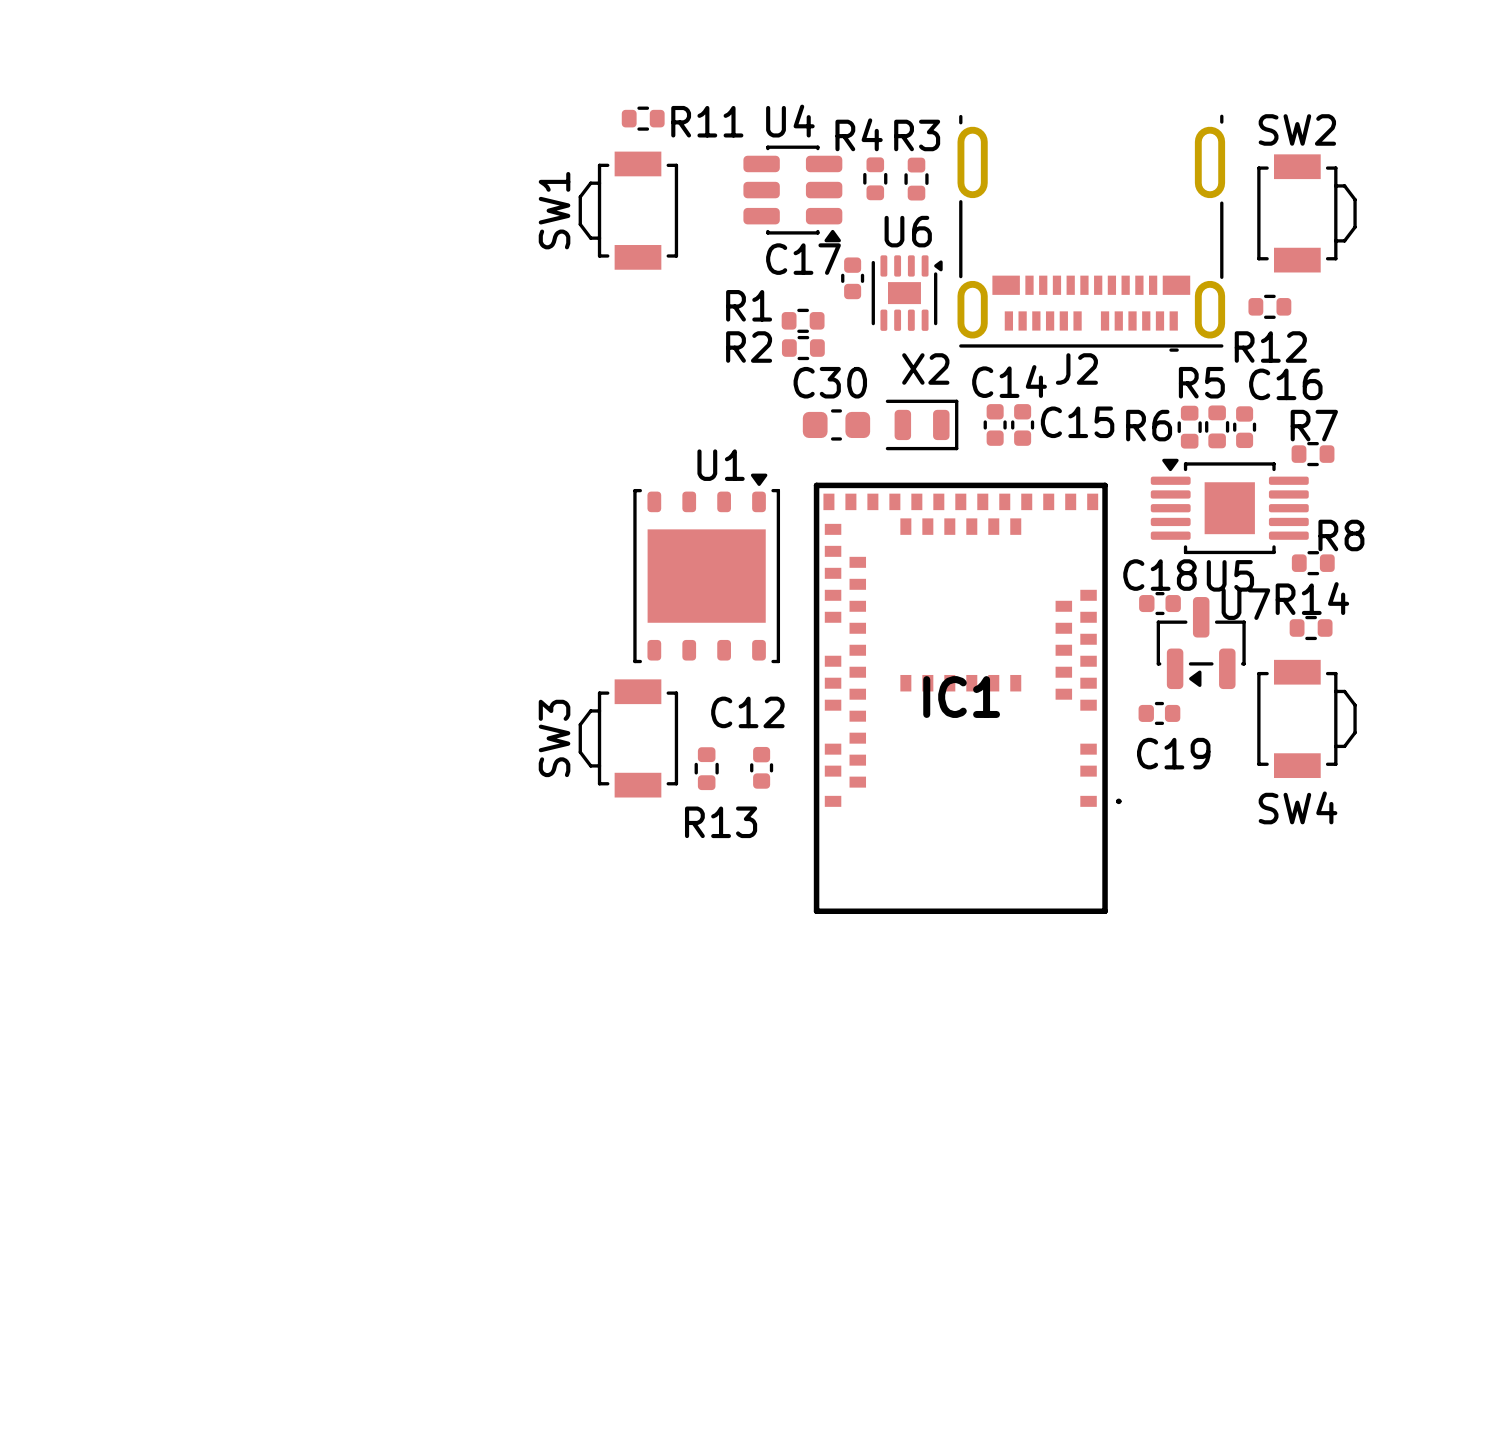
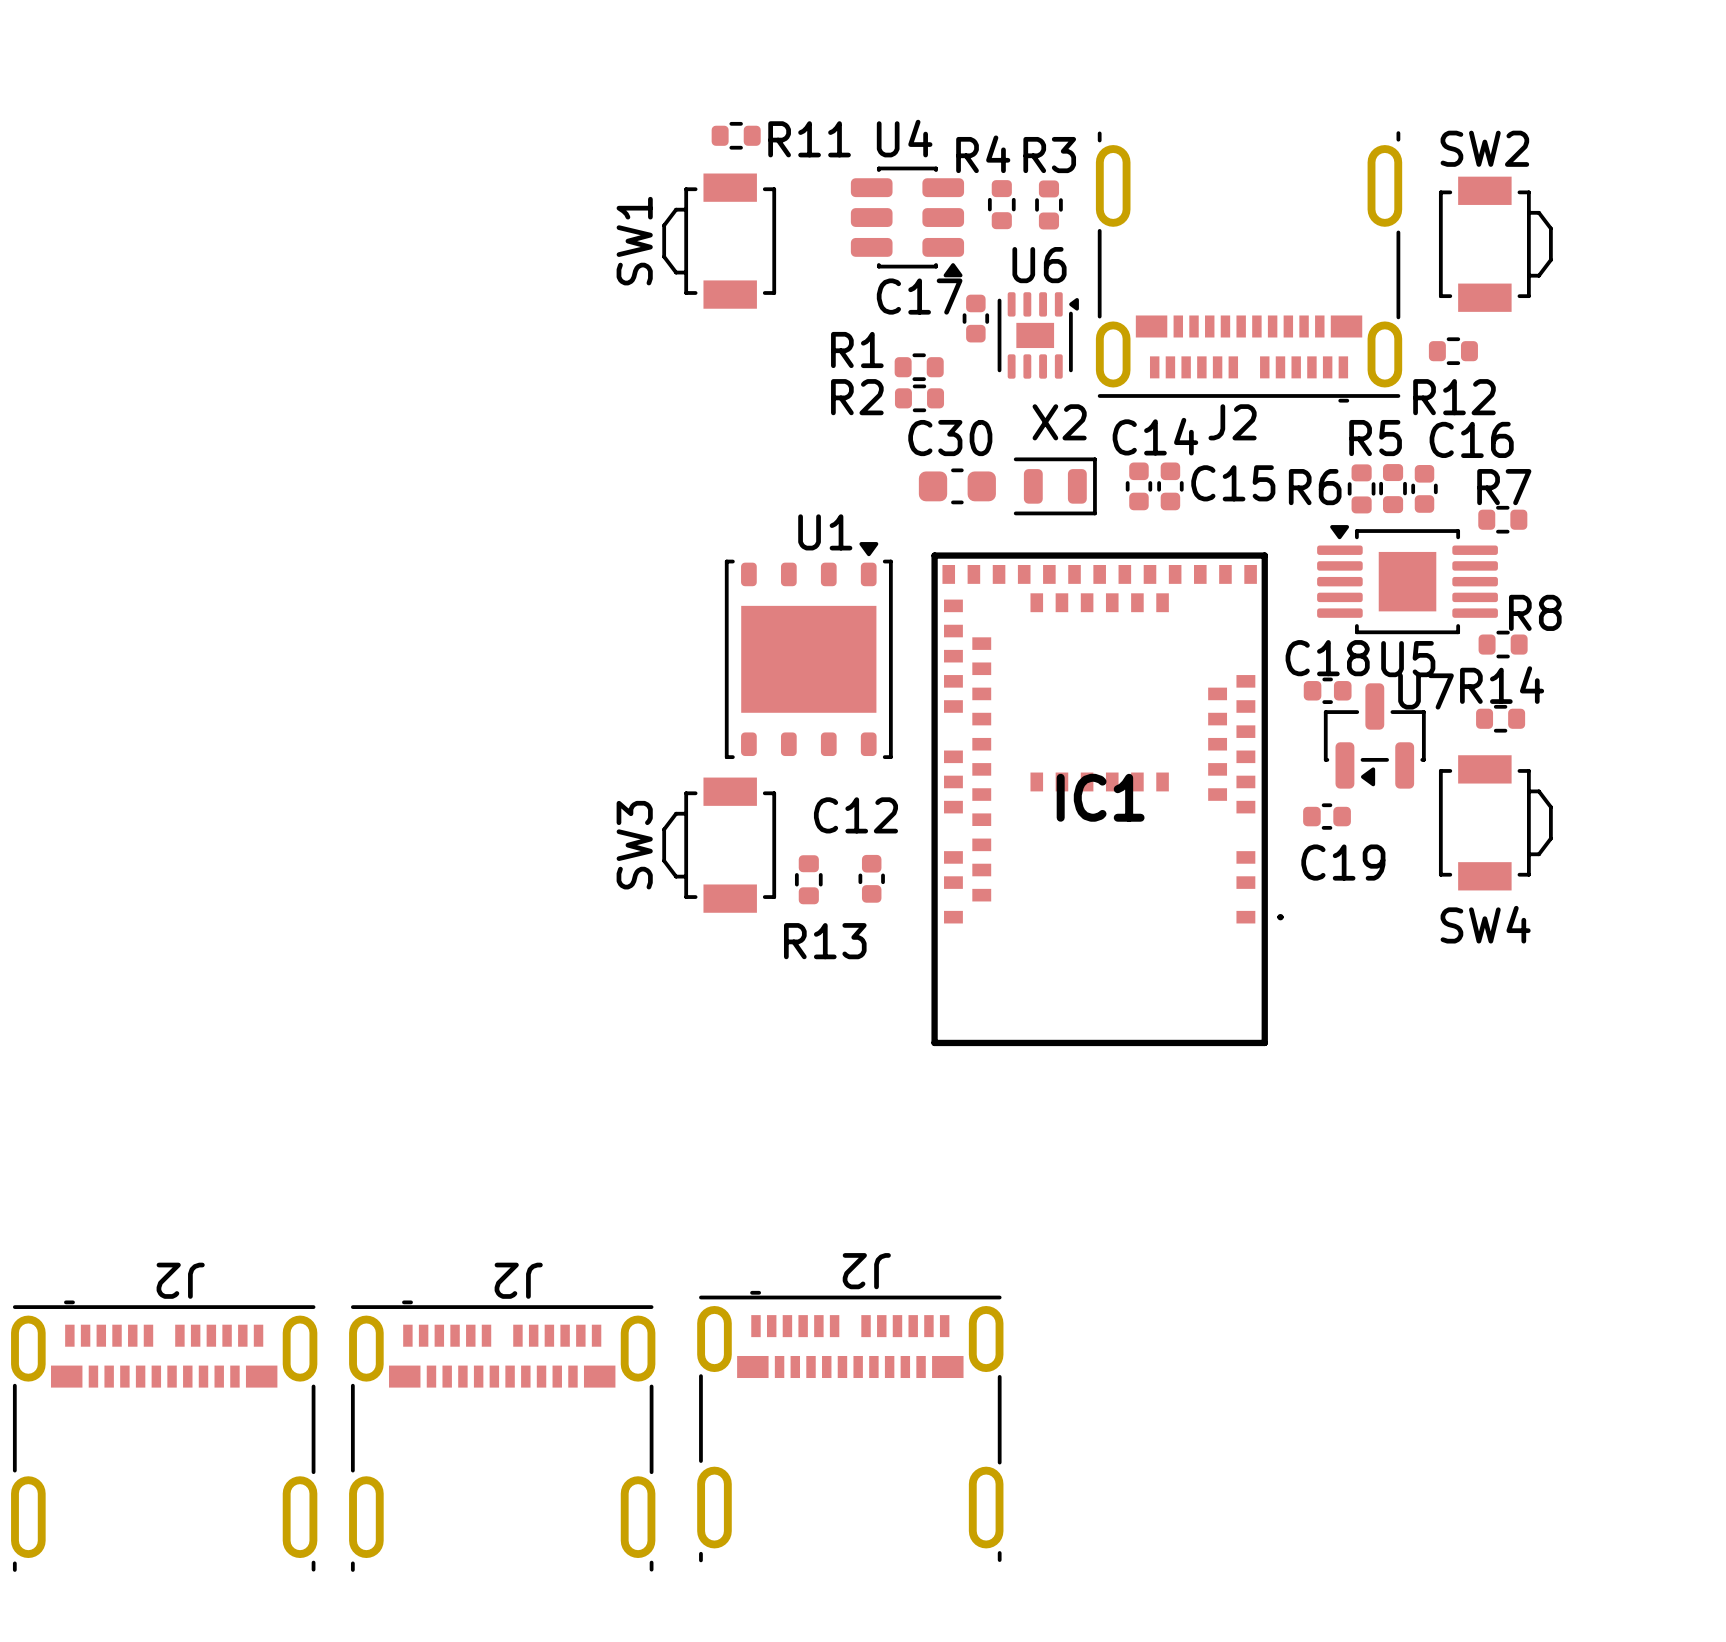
J2: none -> (850, 1426)
J2: none -> (164, 1436)
J2: none -> (502, 1436)

